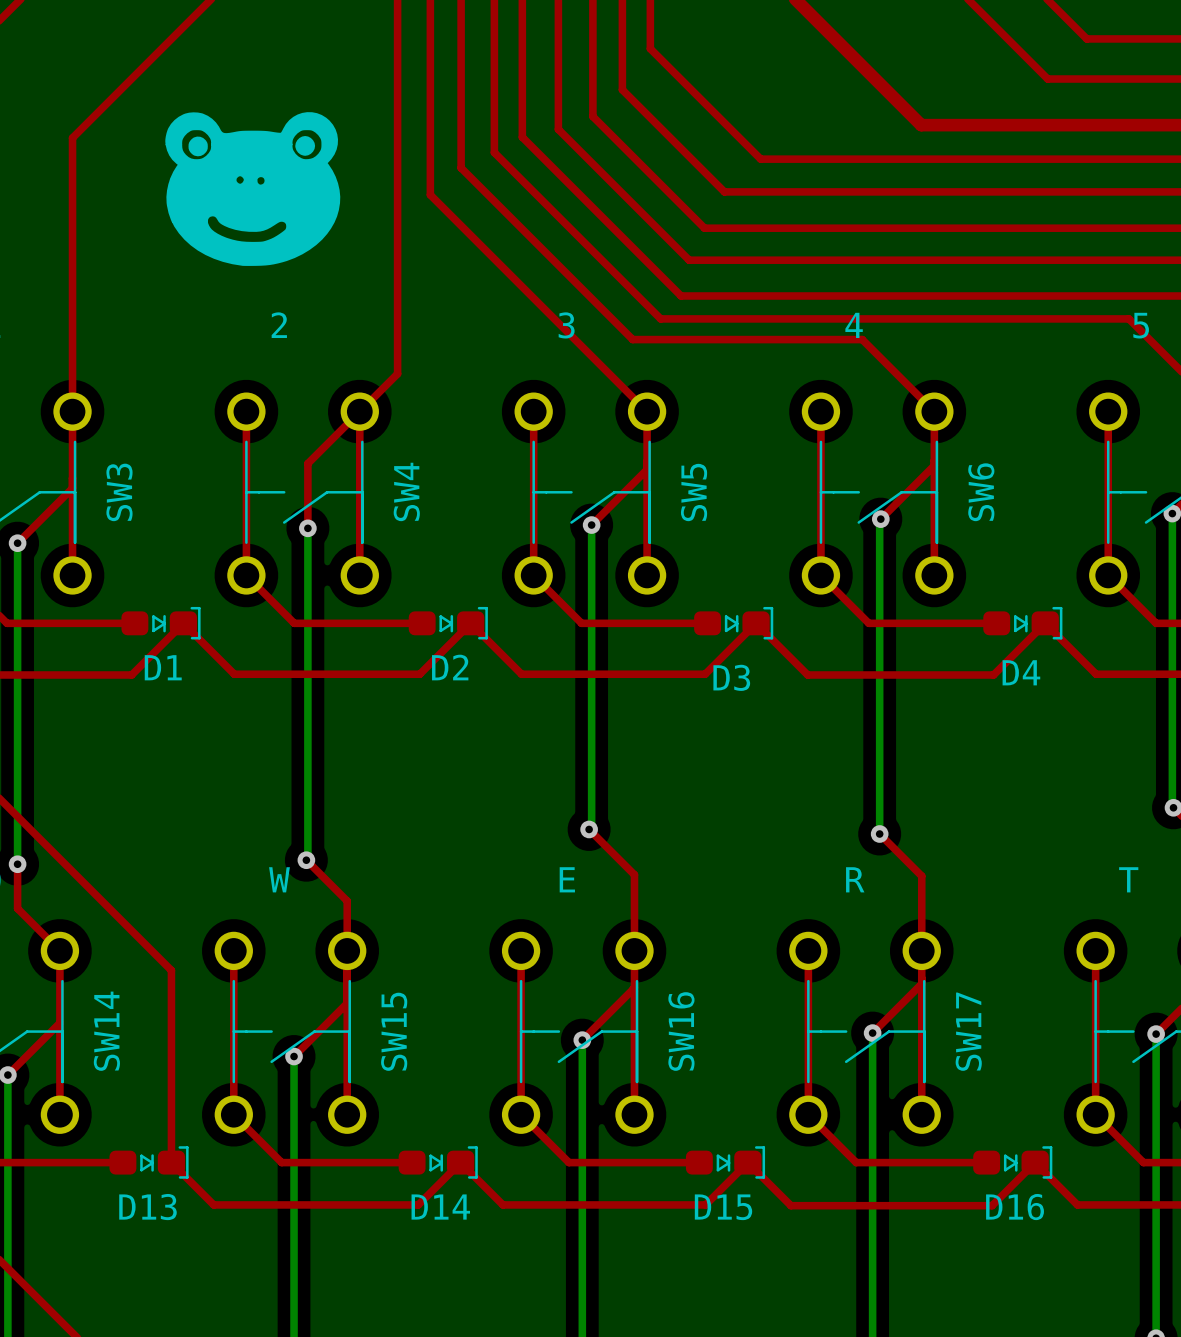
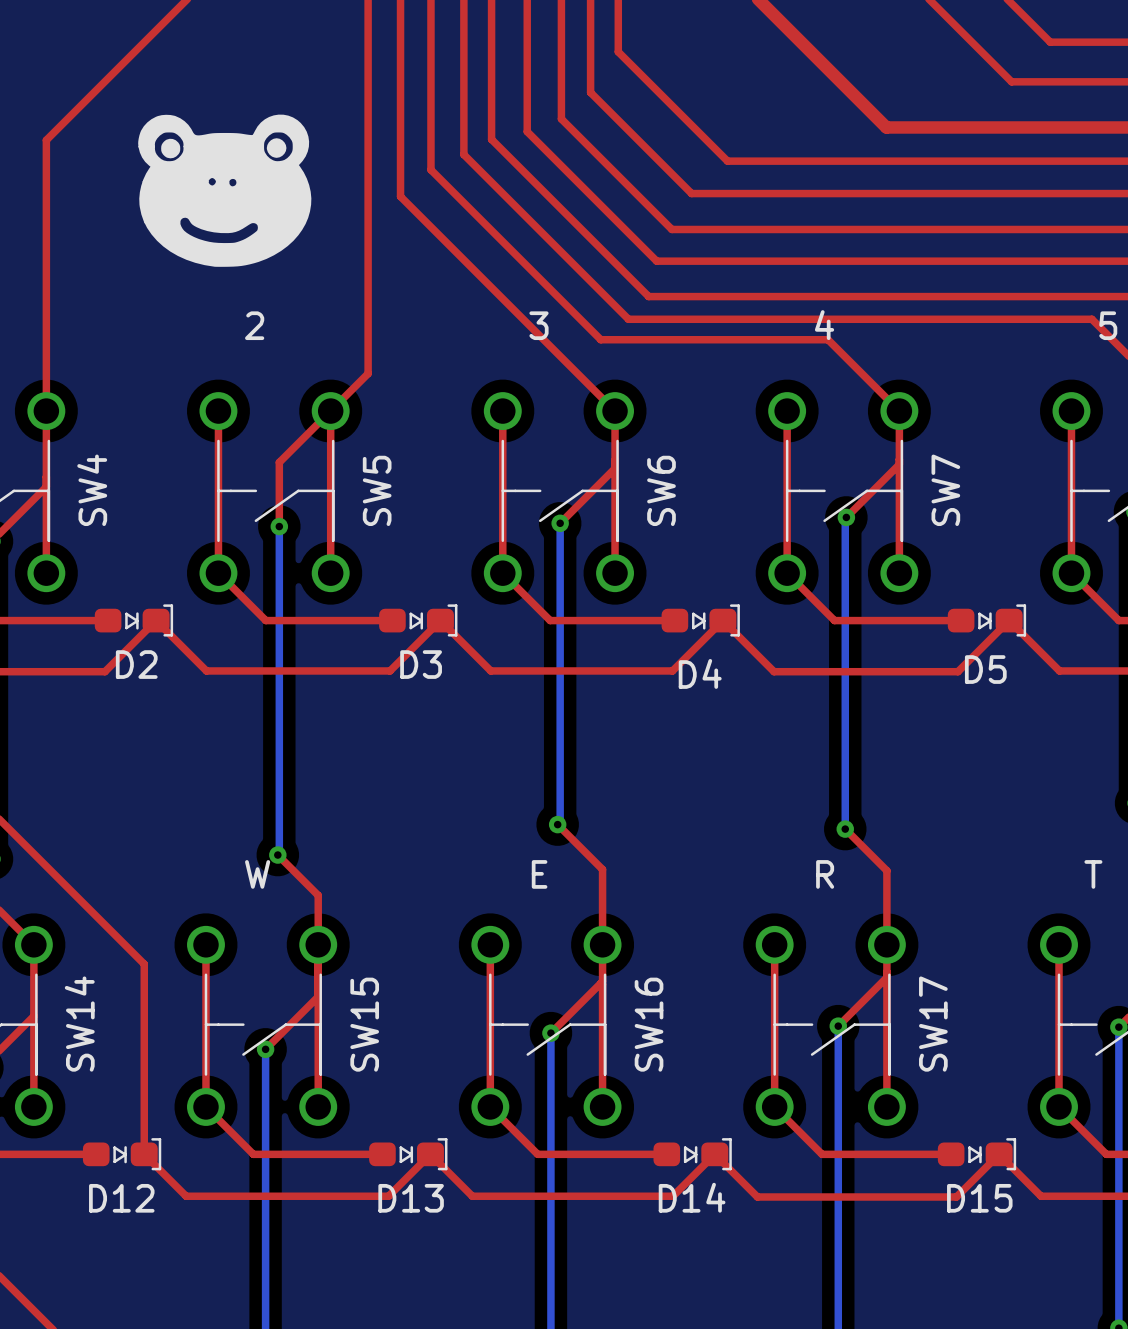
SW4 name: SW4 (406, 491) -> SW5 (377, 490)
SW3 name: SW3 (119, 492) -> SW4 (92, 490)
SW5 name: SW5 (694, 492) -> SW6 (661, 490)
SW6 name: SW6 (981, 492) -> SW7 (945, 490)
D1 name: D1 (163, 667) -> D2 (136, 664)
D2 name: D2 (450, 667) -> D3 (421, 664)
D4 name: D4 (1021, 672) -> D5 (985, 669)
D3 name: D3 (731, 677) -> D4 (700, 673)
D13 name: D13 (147, 1207) -> D12 (121, 1198)
D14 name: D14 (440, 1207) -> D13 (411, 1198)
D15 name: D15 (723, 1207) -> D14 (692, 1197)
D16 name: D16 (1015, 1207) -> D15 (979, 1198)

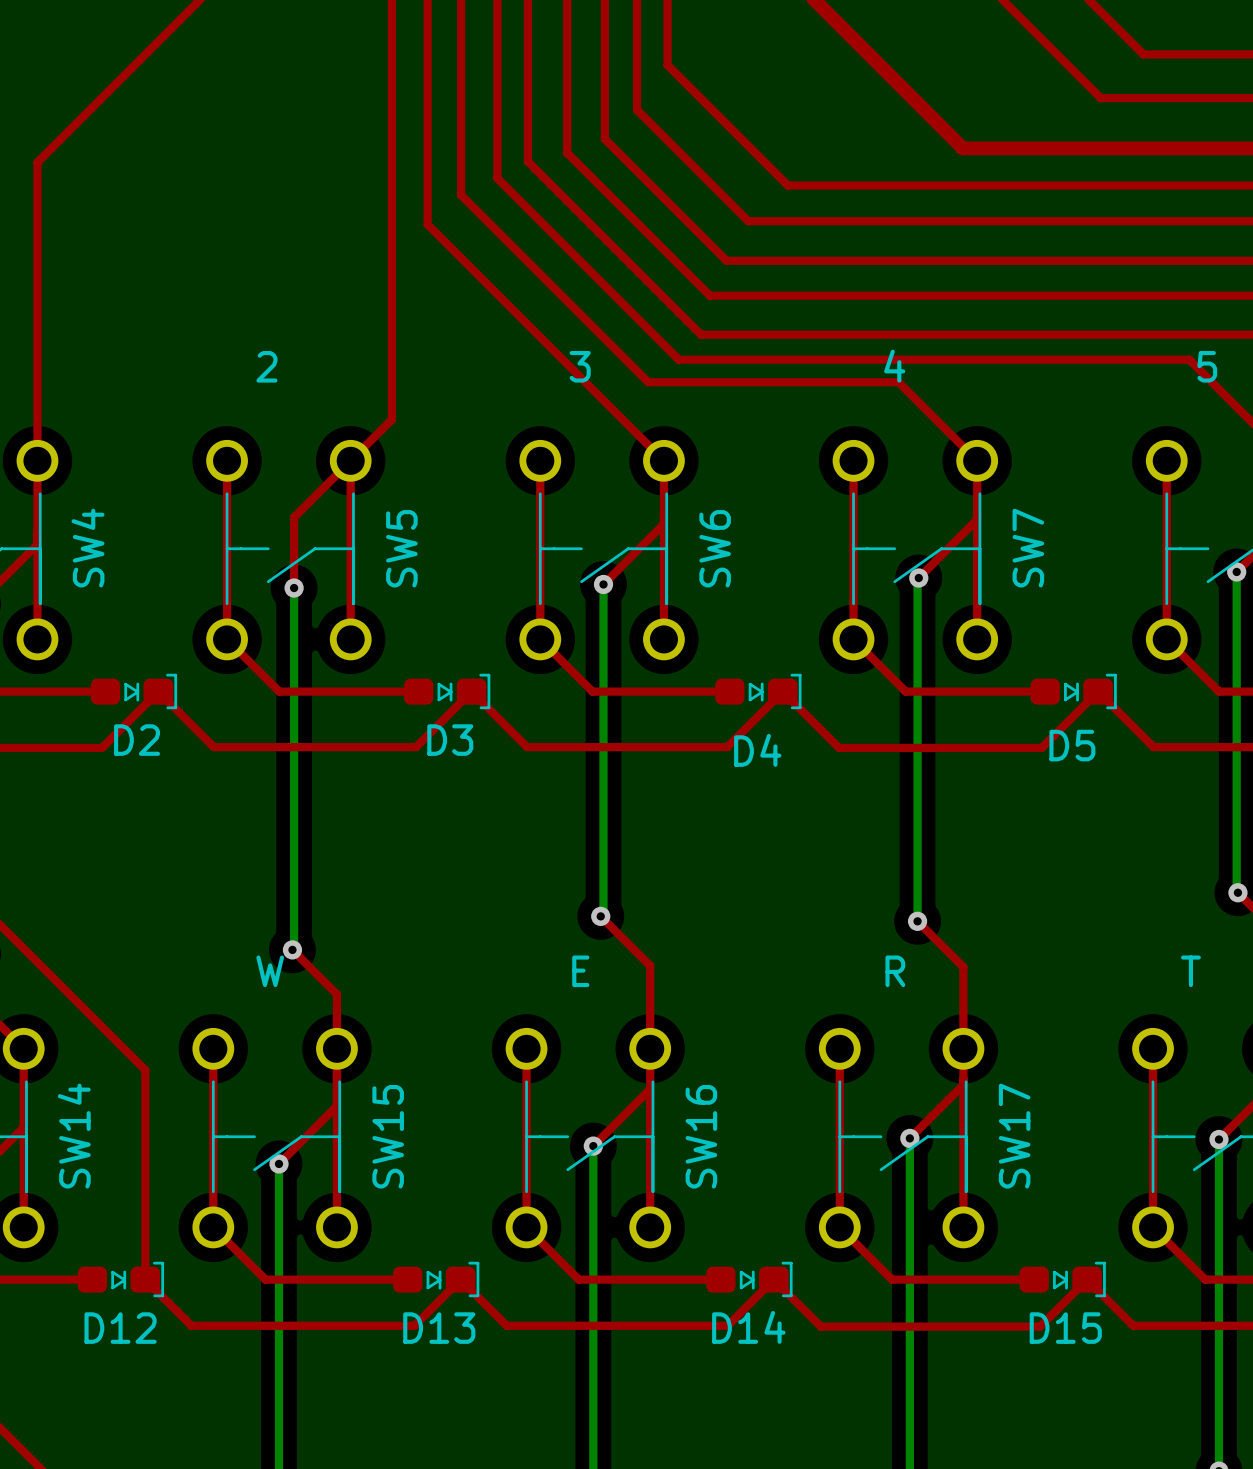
drawing: [138, 114, 312, 267] -> none

